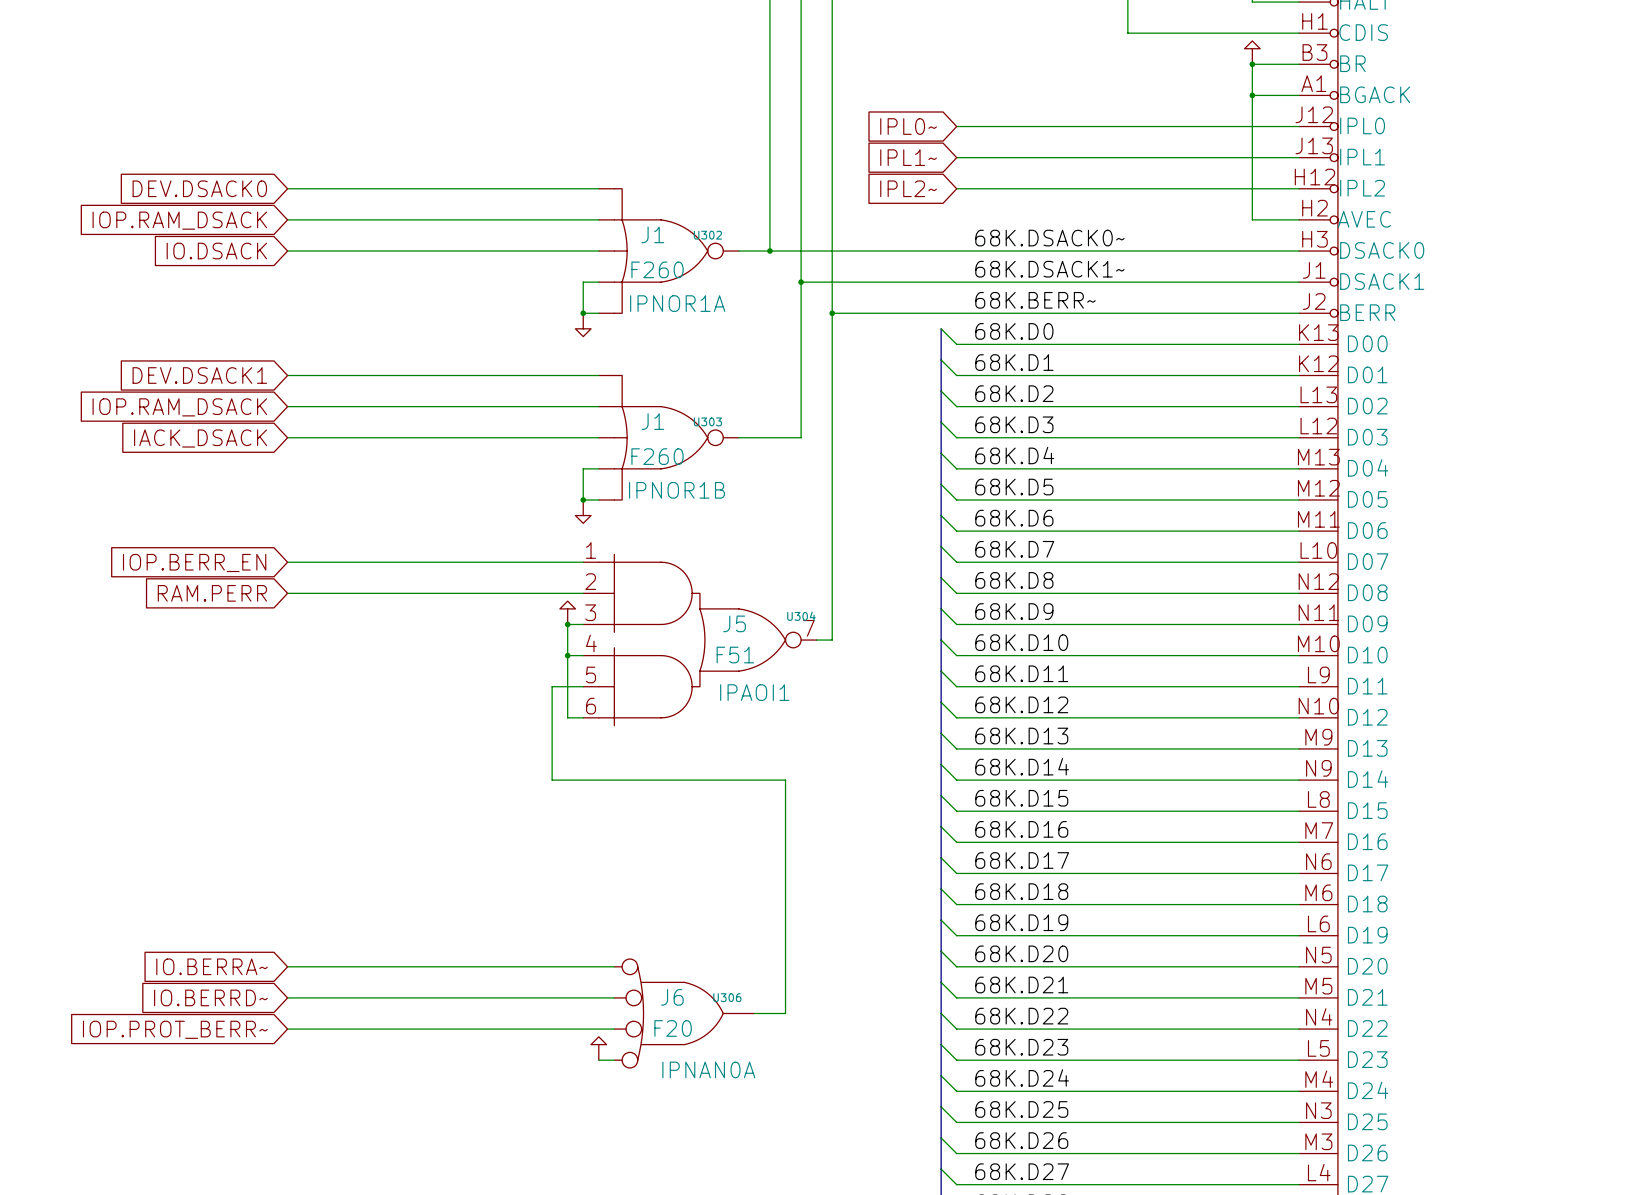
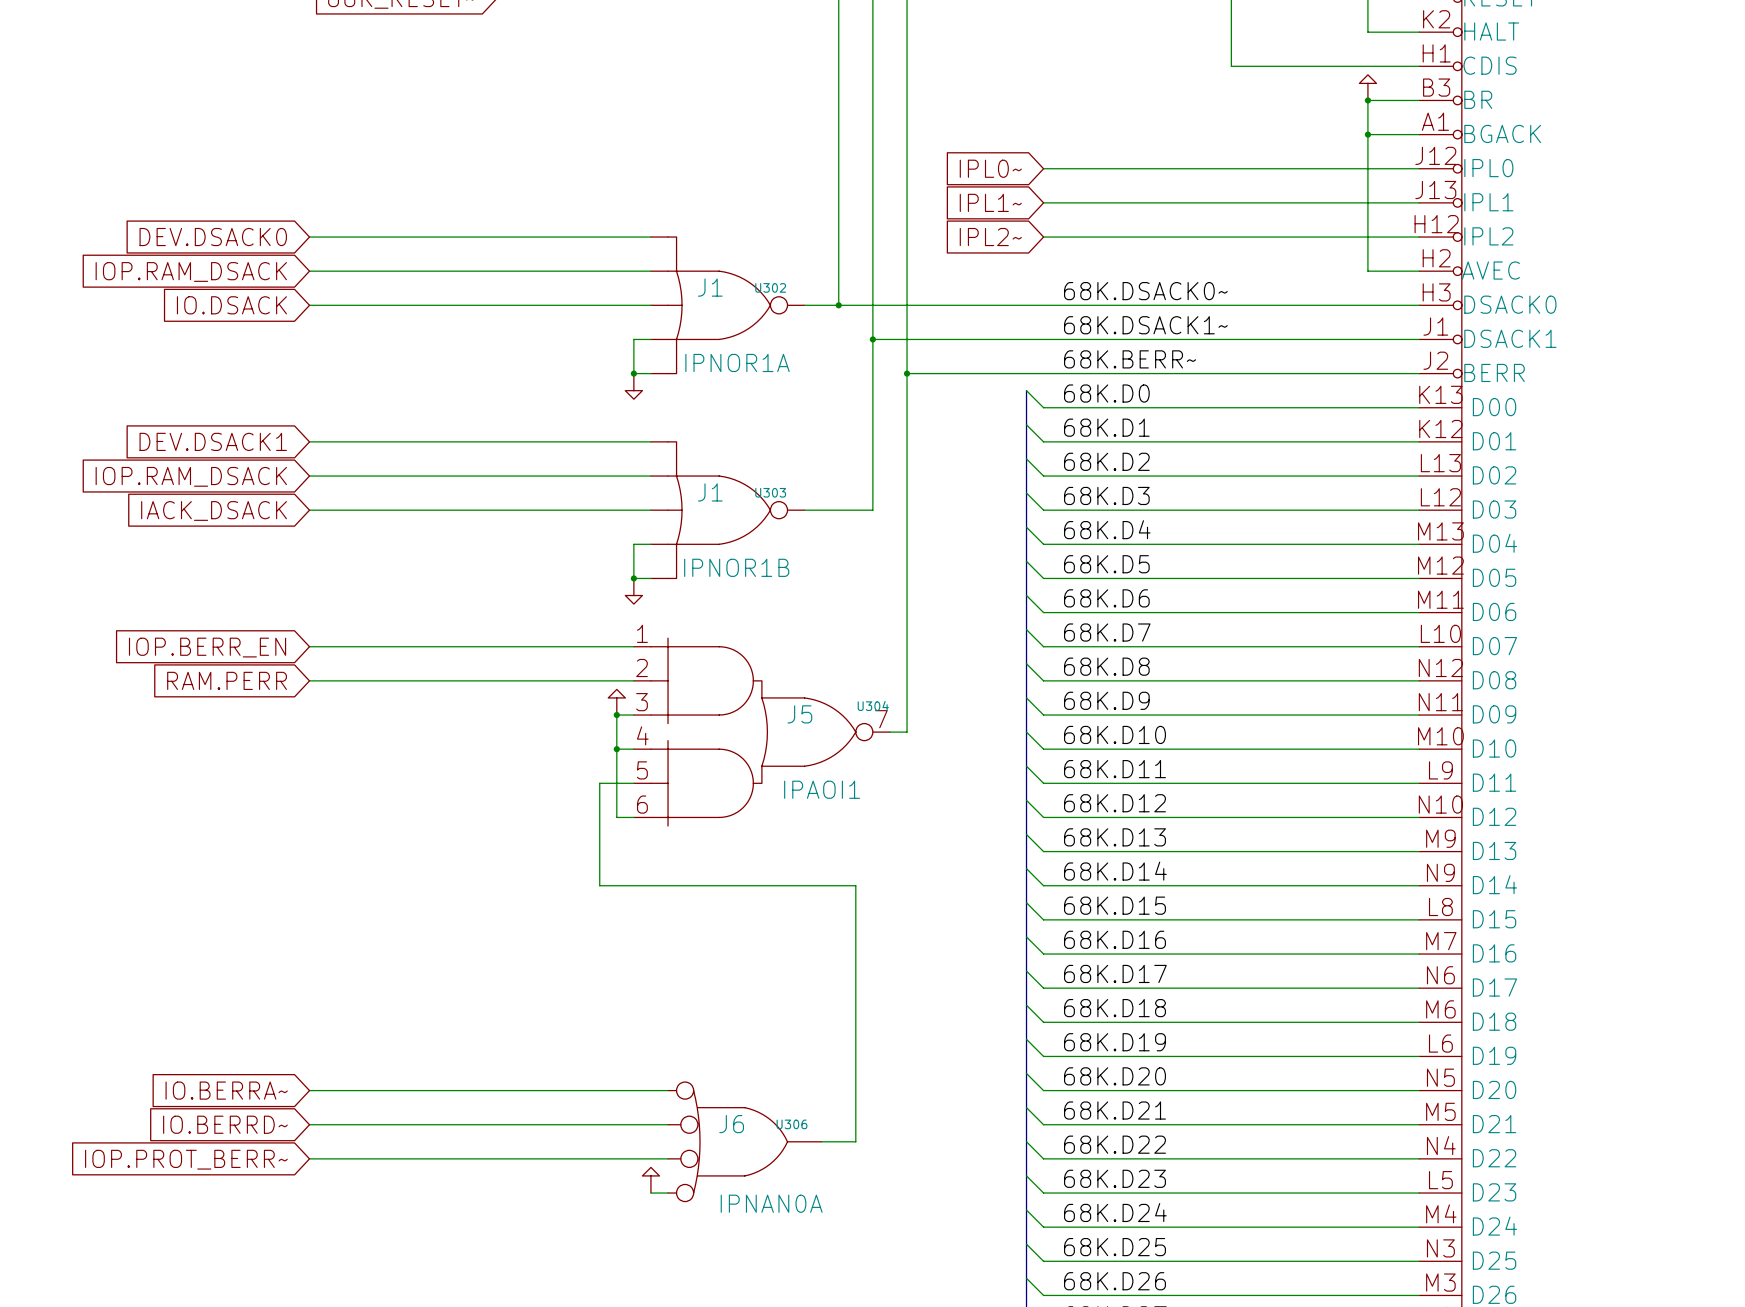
U302 value: F260 (657, 269) -> none
U303 value: F260 (657, 456) -> none
U304 value: F51 (735, 655) -> none
U306 value: F20 (673, 1028) -> none

